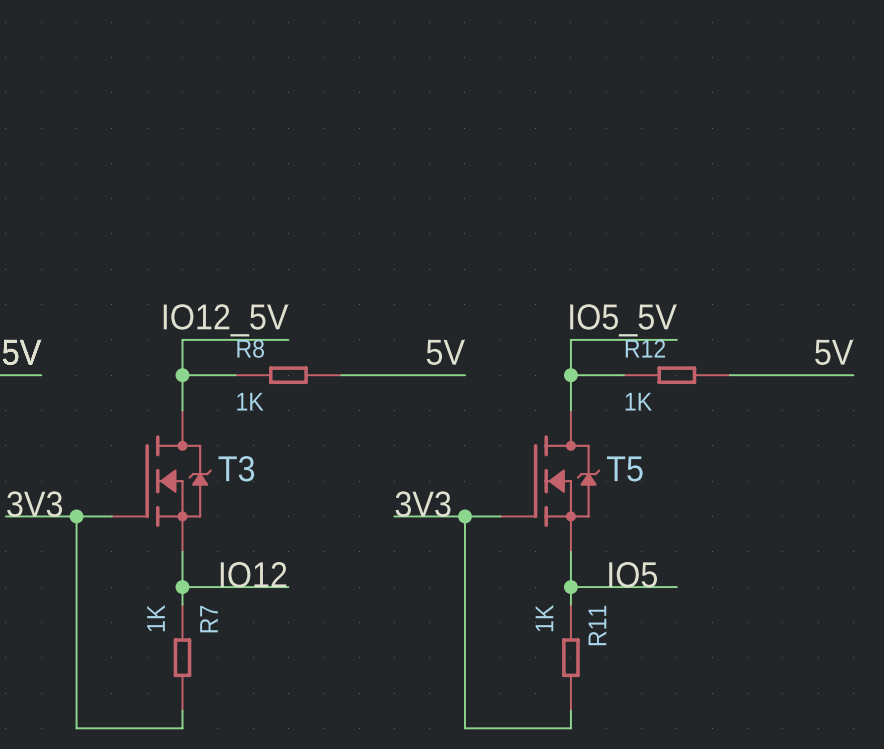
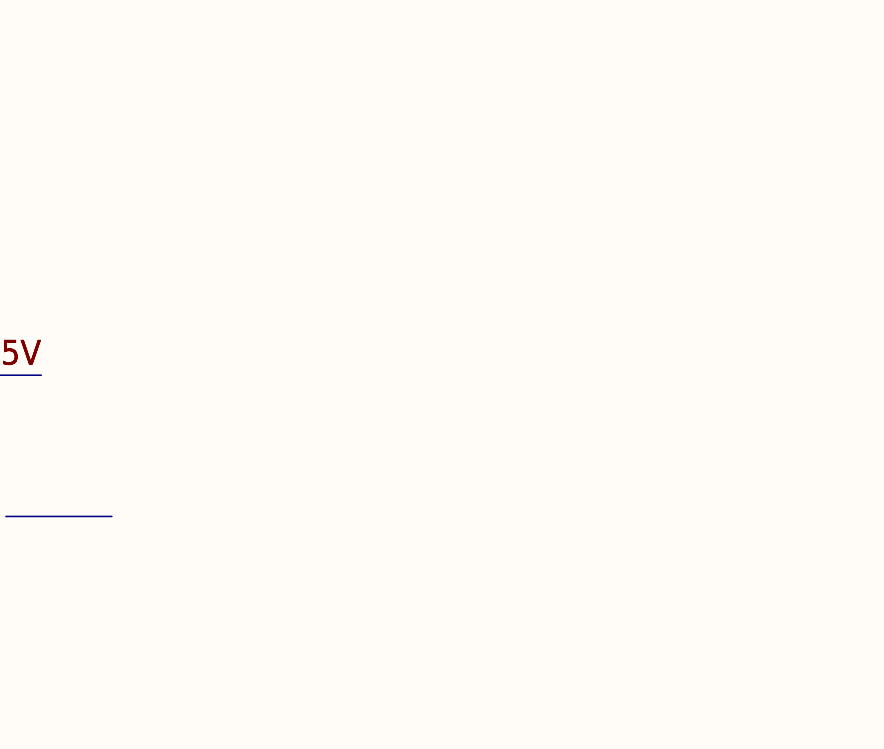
label: IO12_5V (226, 320) -> none
label: IO5_5V (623, 320) -> none
wire: (288, 339) (182, 339) (182, 410) -> none
wire: (676, 339) (570, 339) (570, 410) -> none
label: 5V (445, 352) -> none
label: 5V (834, 352) -> none
wire: (182, 375) (235, 375) -> none
junction: (182, 375) -> none
R8: 1K (288, 375) -> none
wire: (341, 375) (464, 375) -> none
wire: (570, 375) (623, 375) -> none
junction: (570, 375) -> none
R12: 1K (676, 375) -> none
wire: (729, 375) (853, 375) -> none
T3: (161, 481) -> none
T5: (550, 481) -> none
label: 3V3 (34, 504) -> none
label: 3V3 (423, 504) -> none
wire: (76, 516) (76, 728) (182, 728) (182, 710) -> none
junction: (76, 516) -> none
wire: (394, 516) (500, 516) -> none
wire: (464, 516) (464, 728) (570, 728) (570, 710) -> none
junction: (464, 516) -> none
wire: (182, 551) (182, 604) -> none
wire: (570, 551) (570, 604) -> none
label: IO12 (253, 574) -> none
label: IO5 (633, 574) -> none
wire: (182, 587) (288, 587) -> none
junction: (182, 587) -> none
wire: (570, 587) (676, 587) -> none
junction: (570, 587) -> none
R7: 1K (182, 657) -> none
R11: 1K (570, 657) -> none

